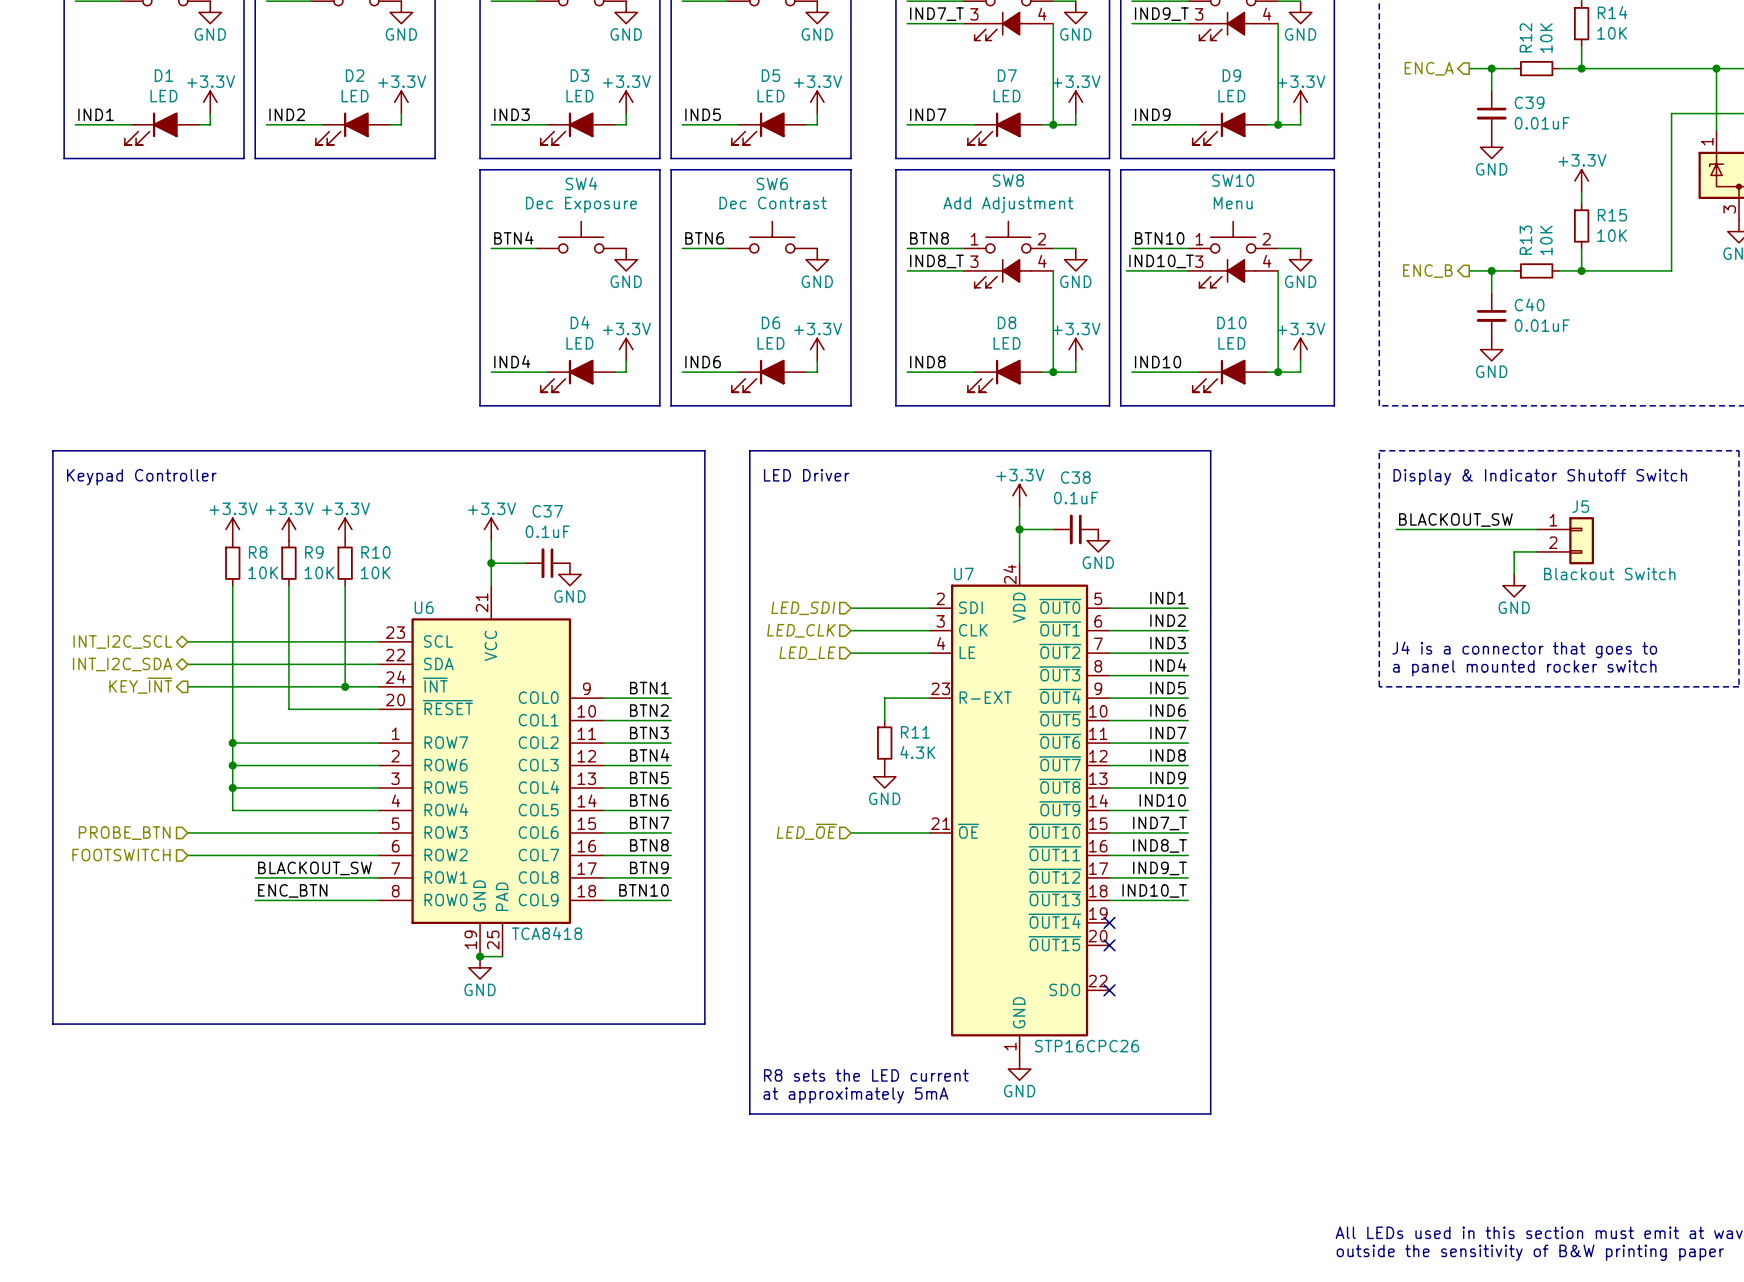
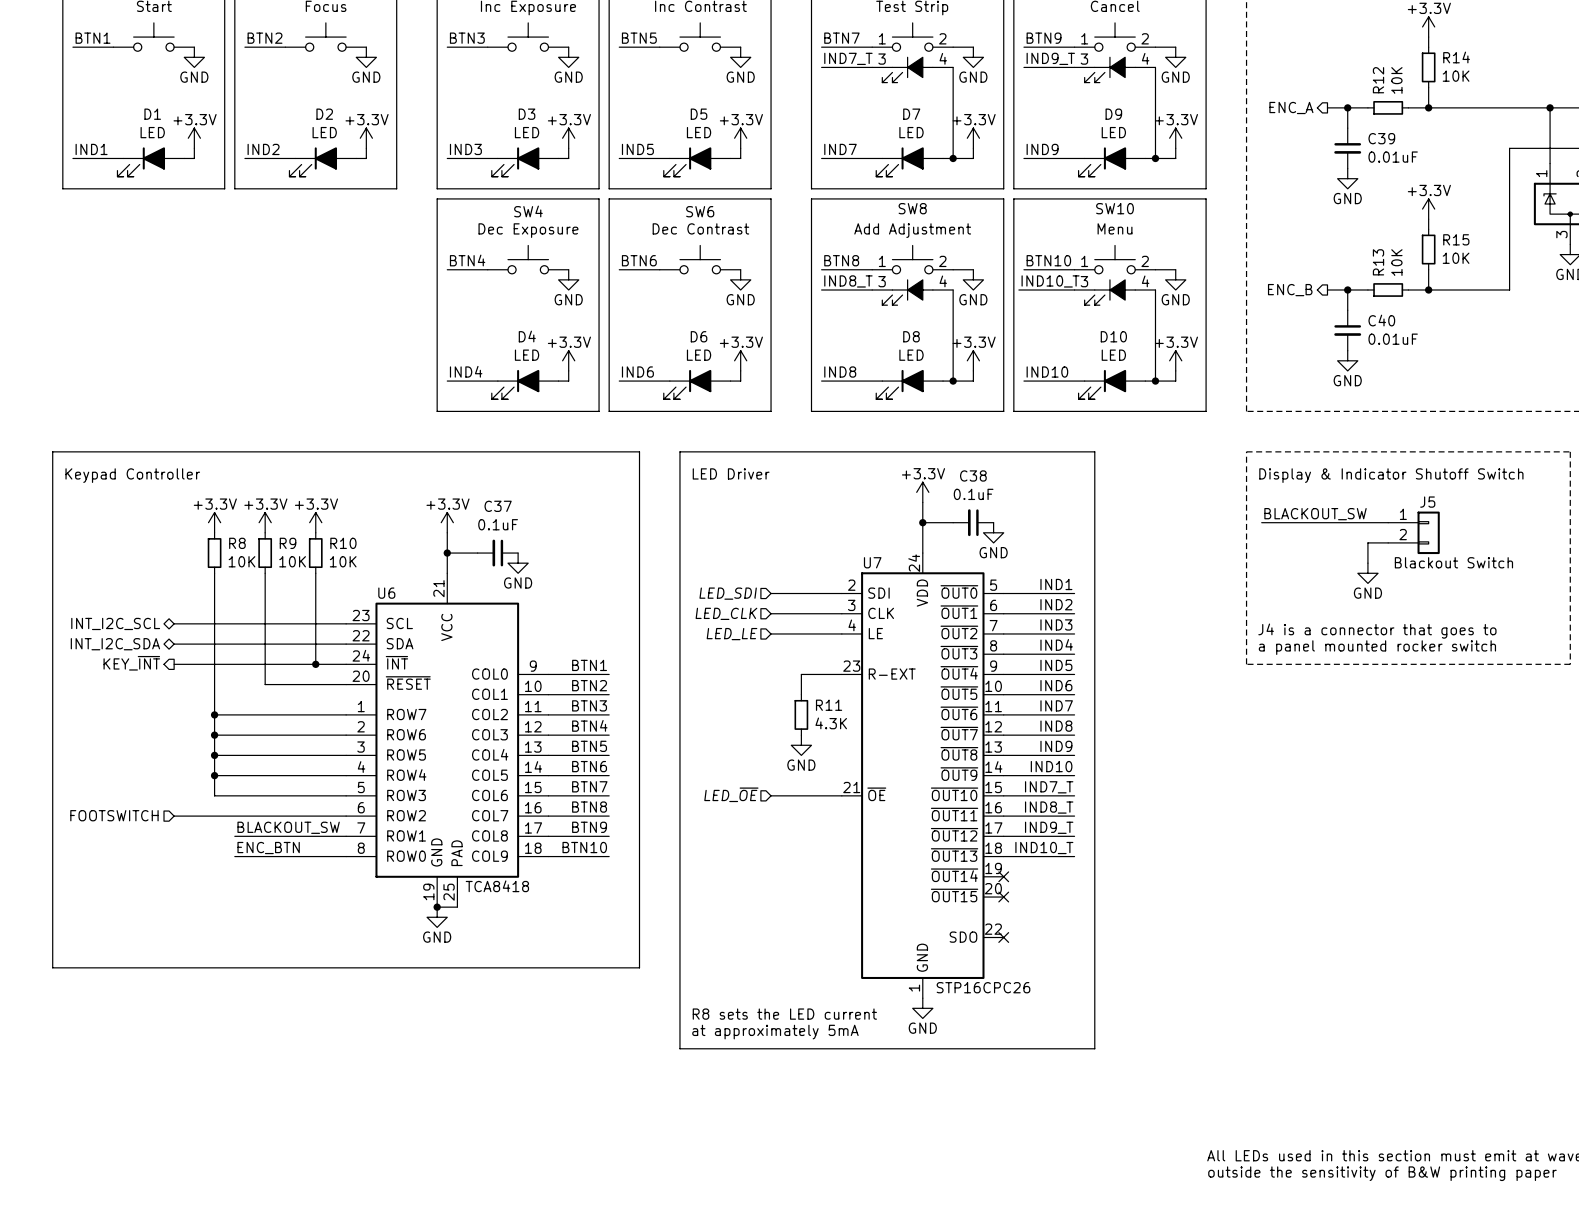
junction: none -> (214, 775)
wire: (187, 832) (232, 832) -> (214, 775) (214, 795)
hierarchical label: PROBE_BTN (124, 833) -> none

